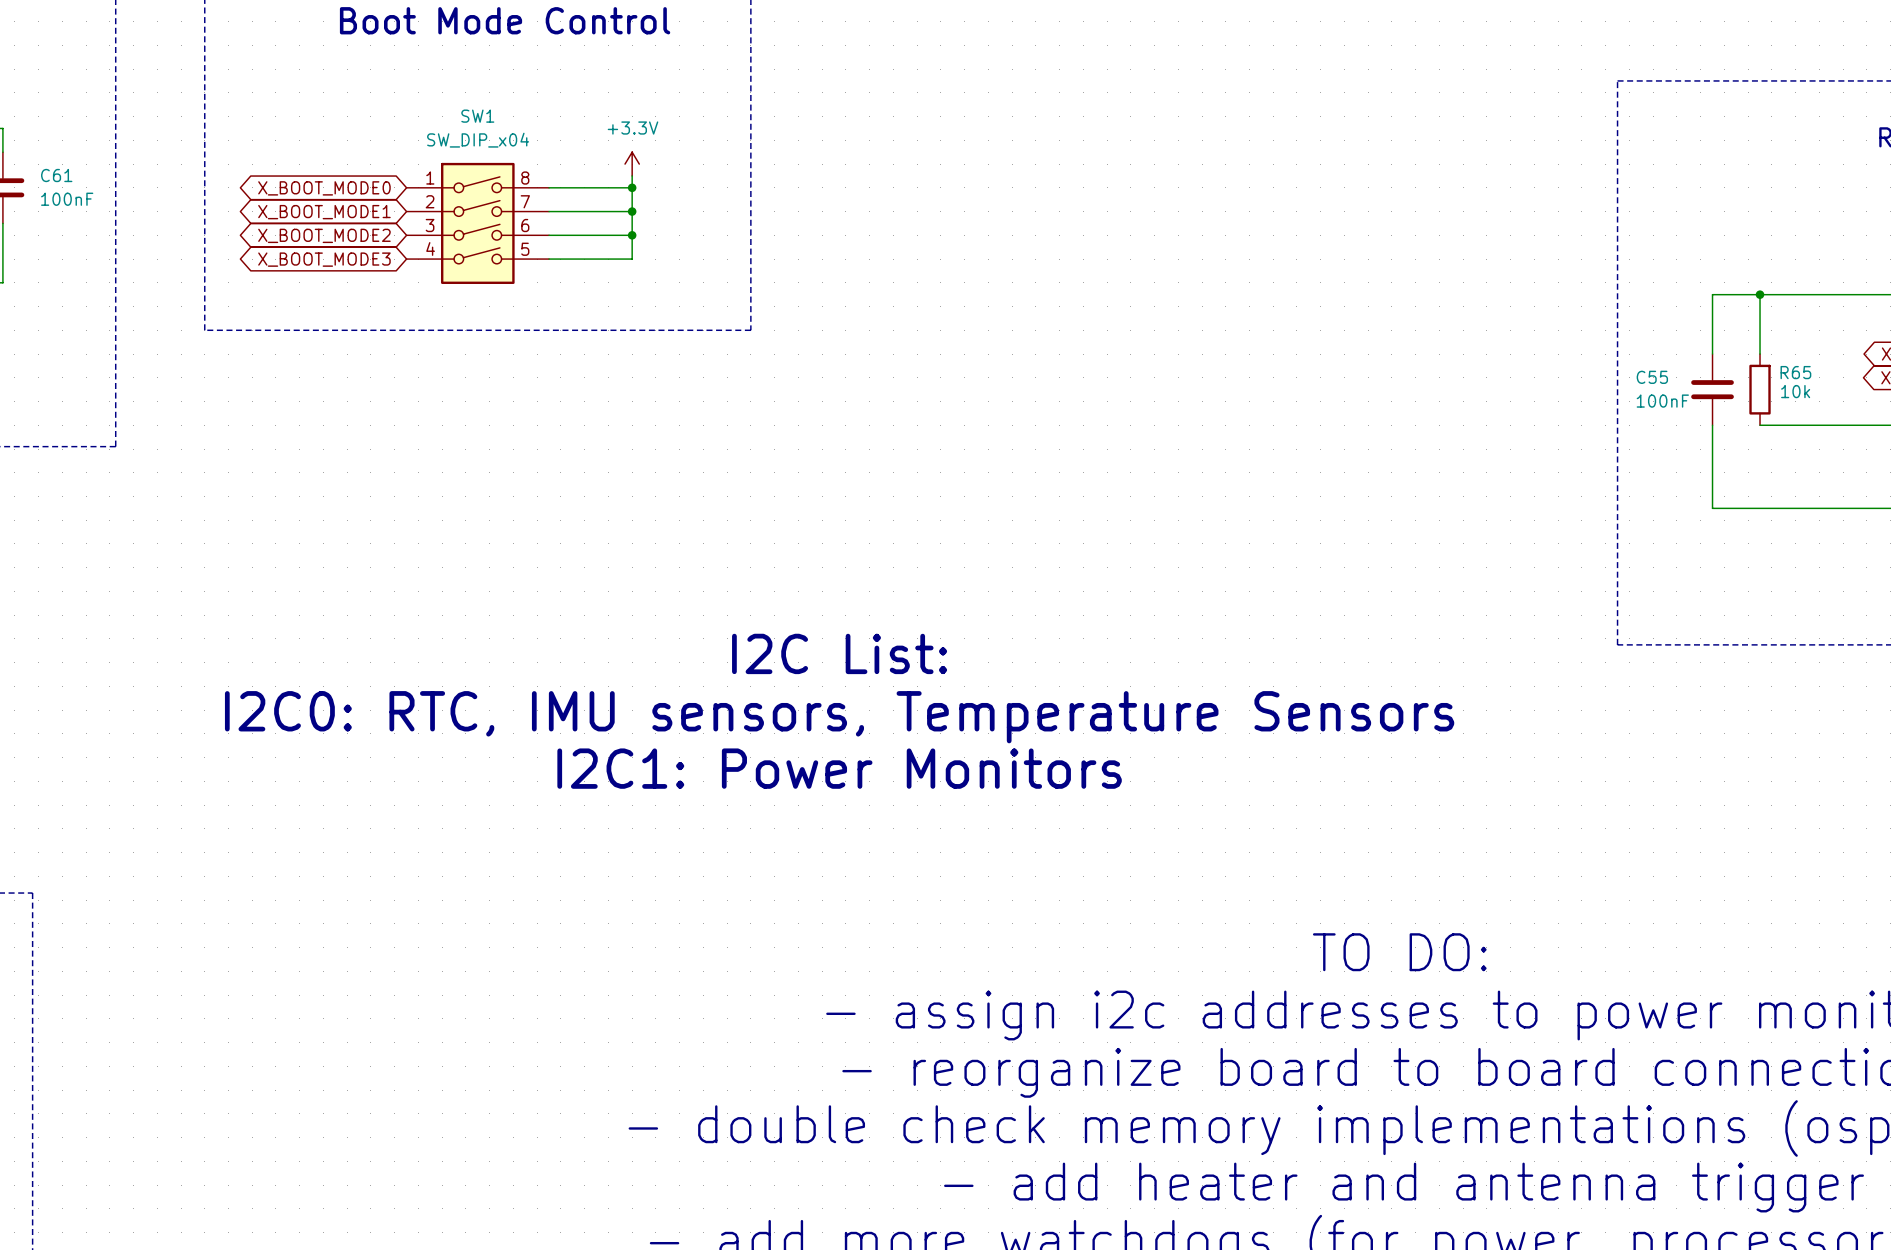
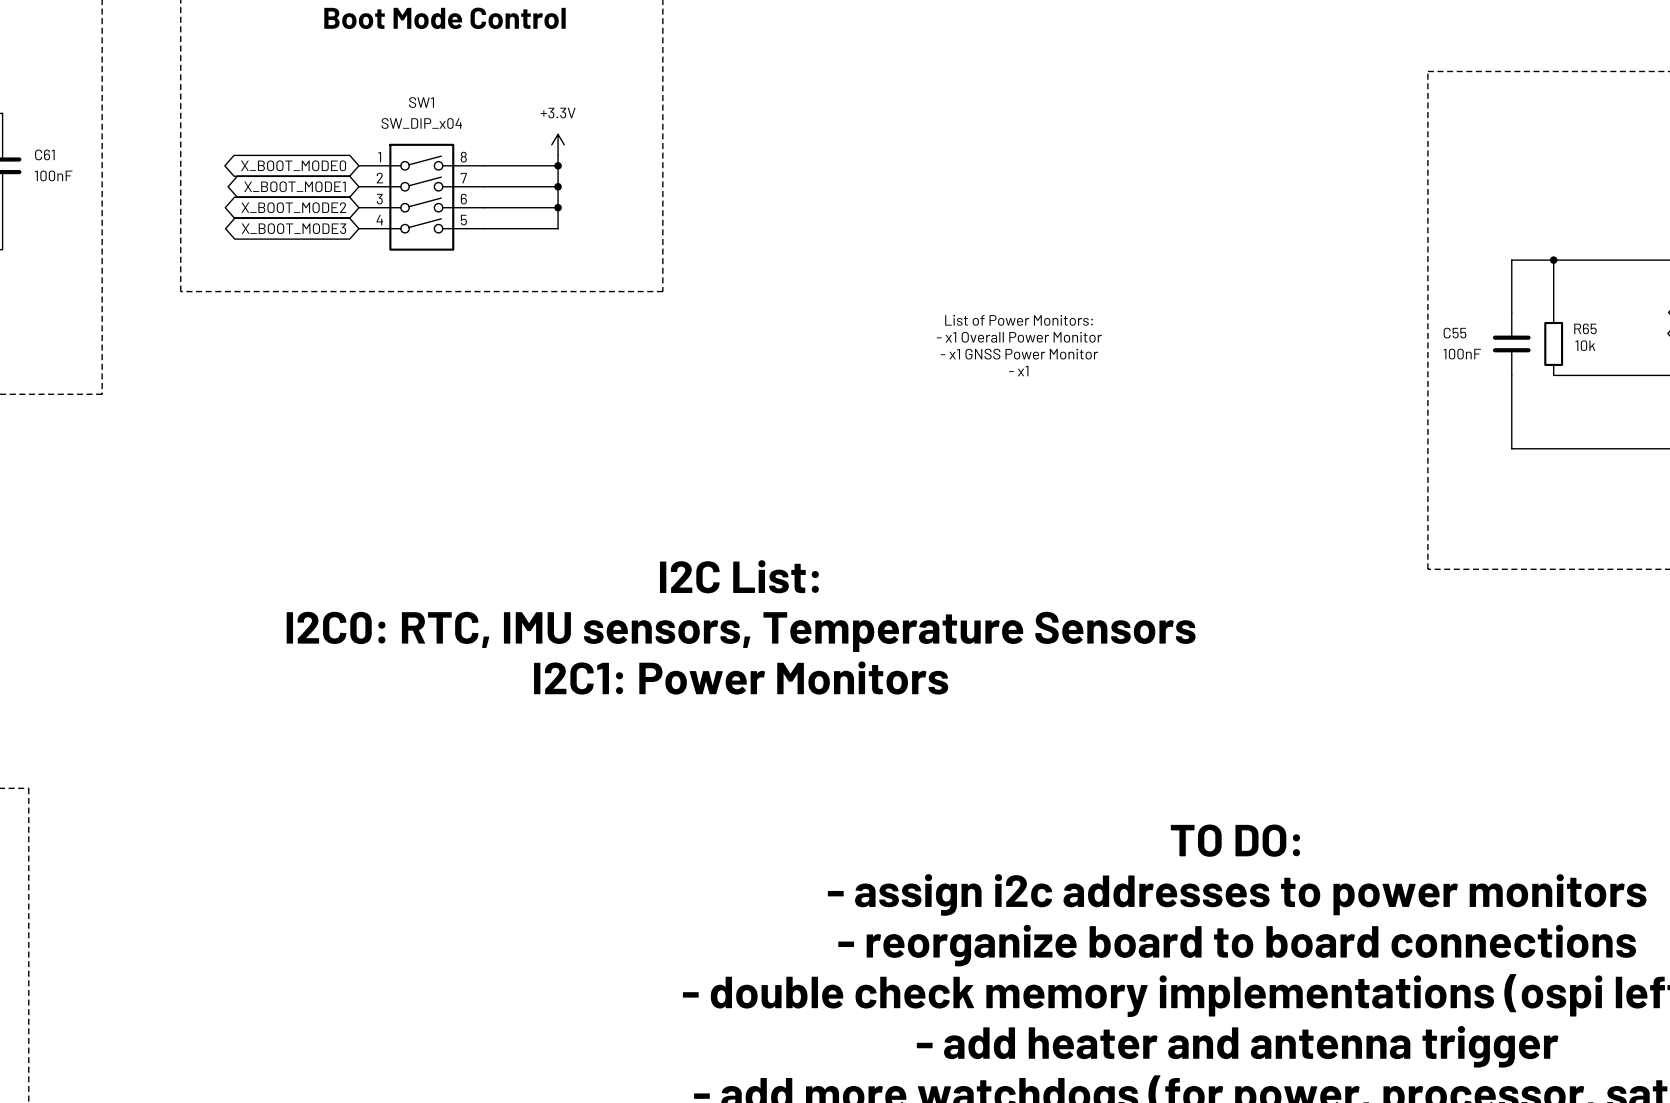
text: none -> List of Power Monitors: (1019, 320)
text: none -> - x1 Overall Power Monitor (1019, 337)
text: none -> - x1 GNSS Power Monitor (1019, 354)
text: none -> - x1 (1018, 371)

